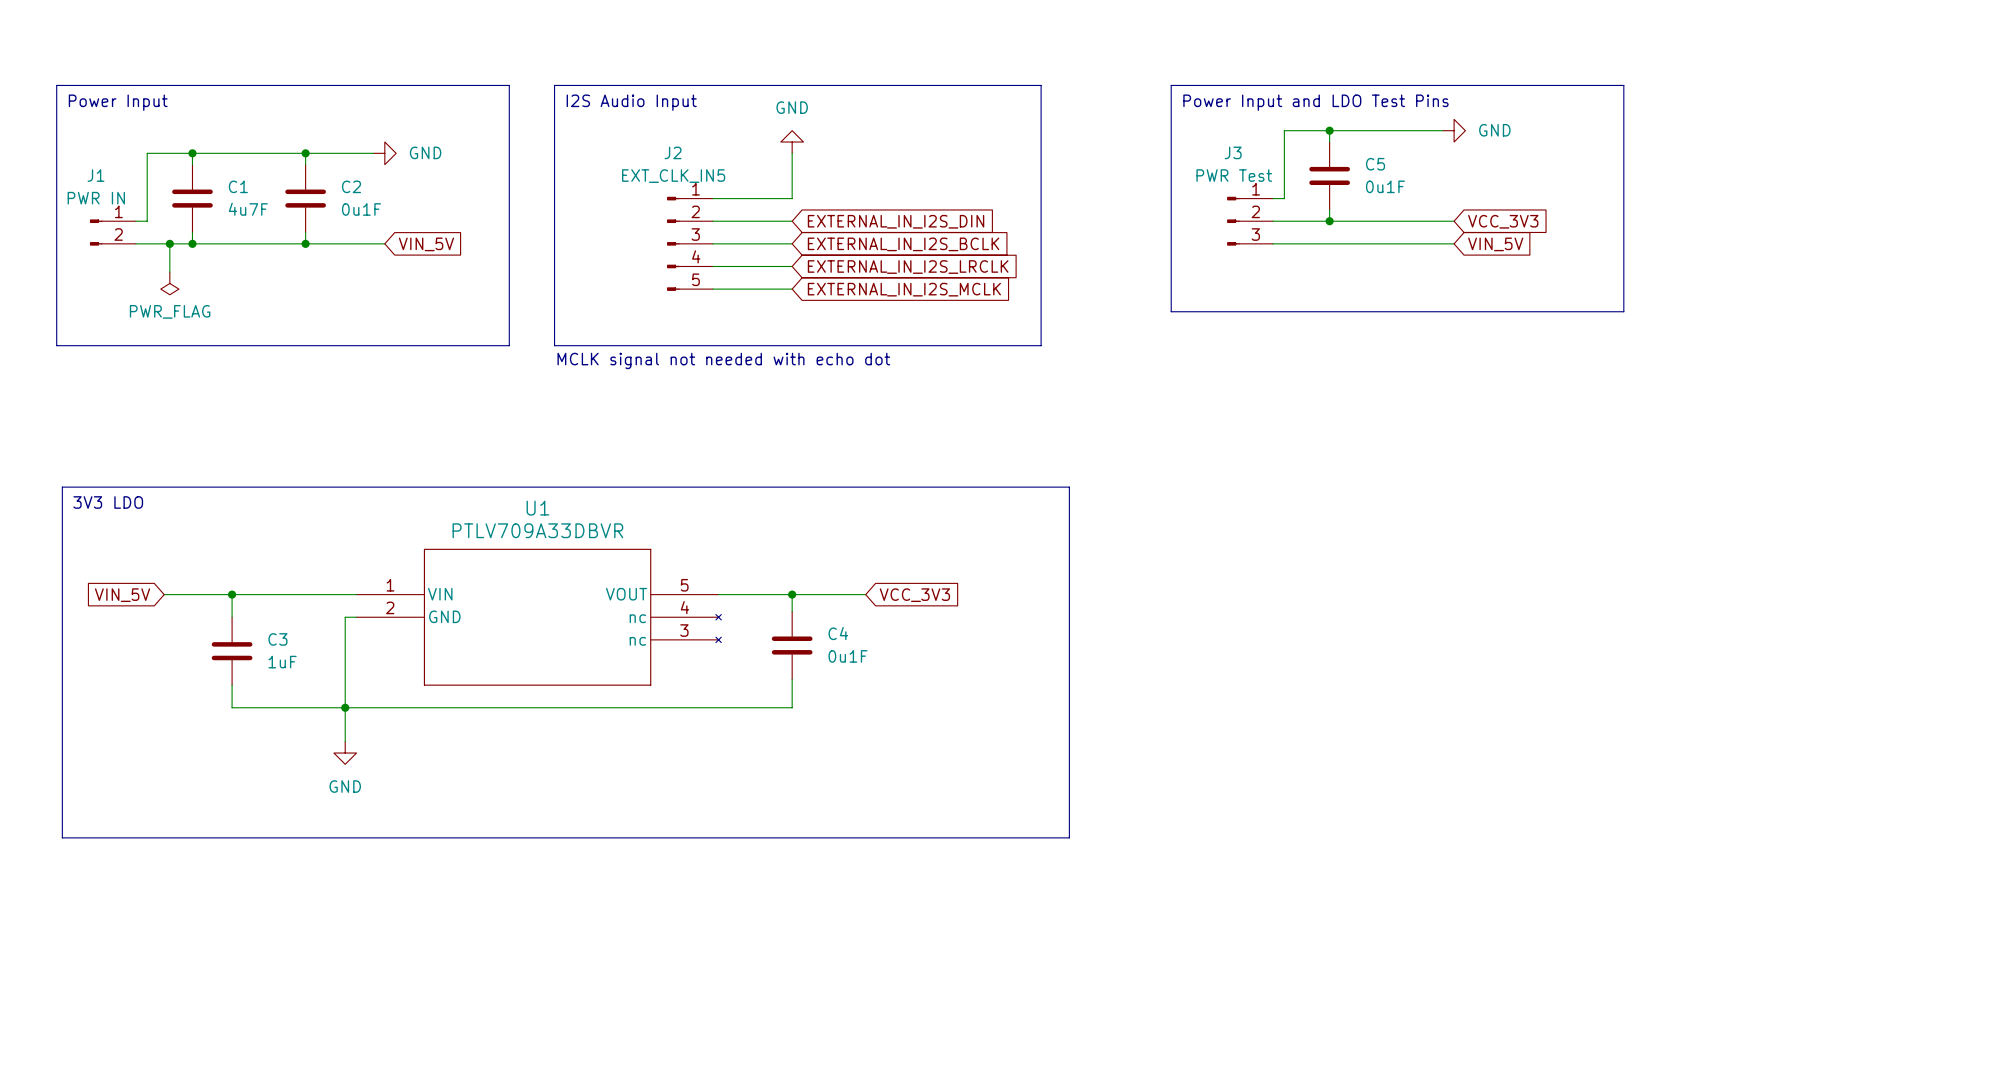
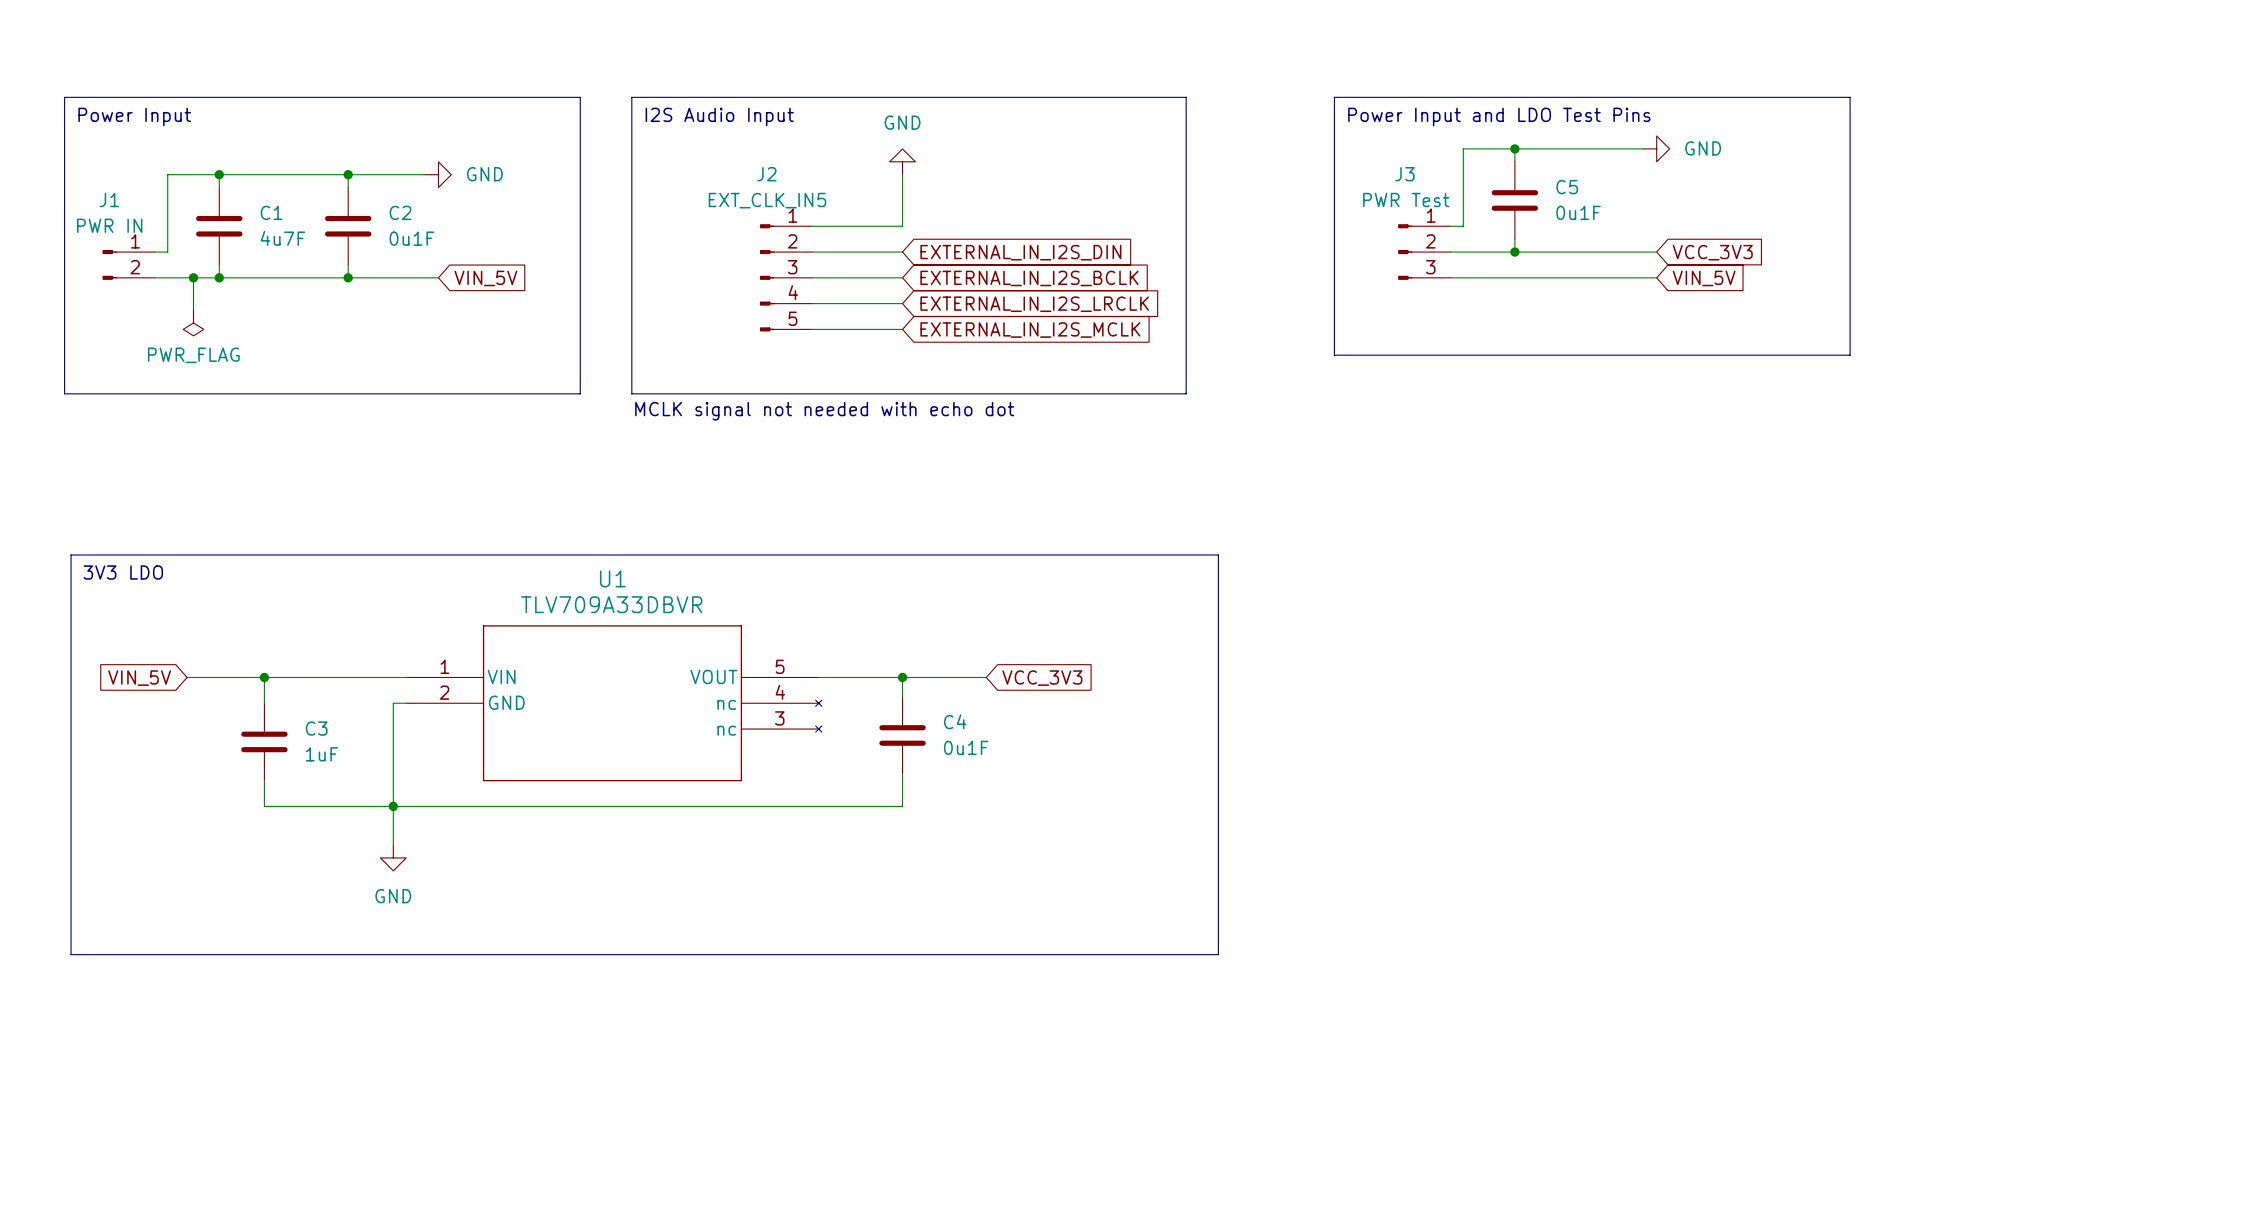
U1 value: PTLV709A33DBVR (537, 530) -> TLV709A33DBVR (611, 604)

